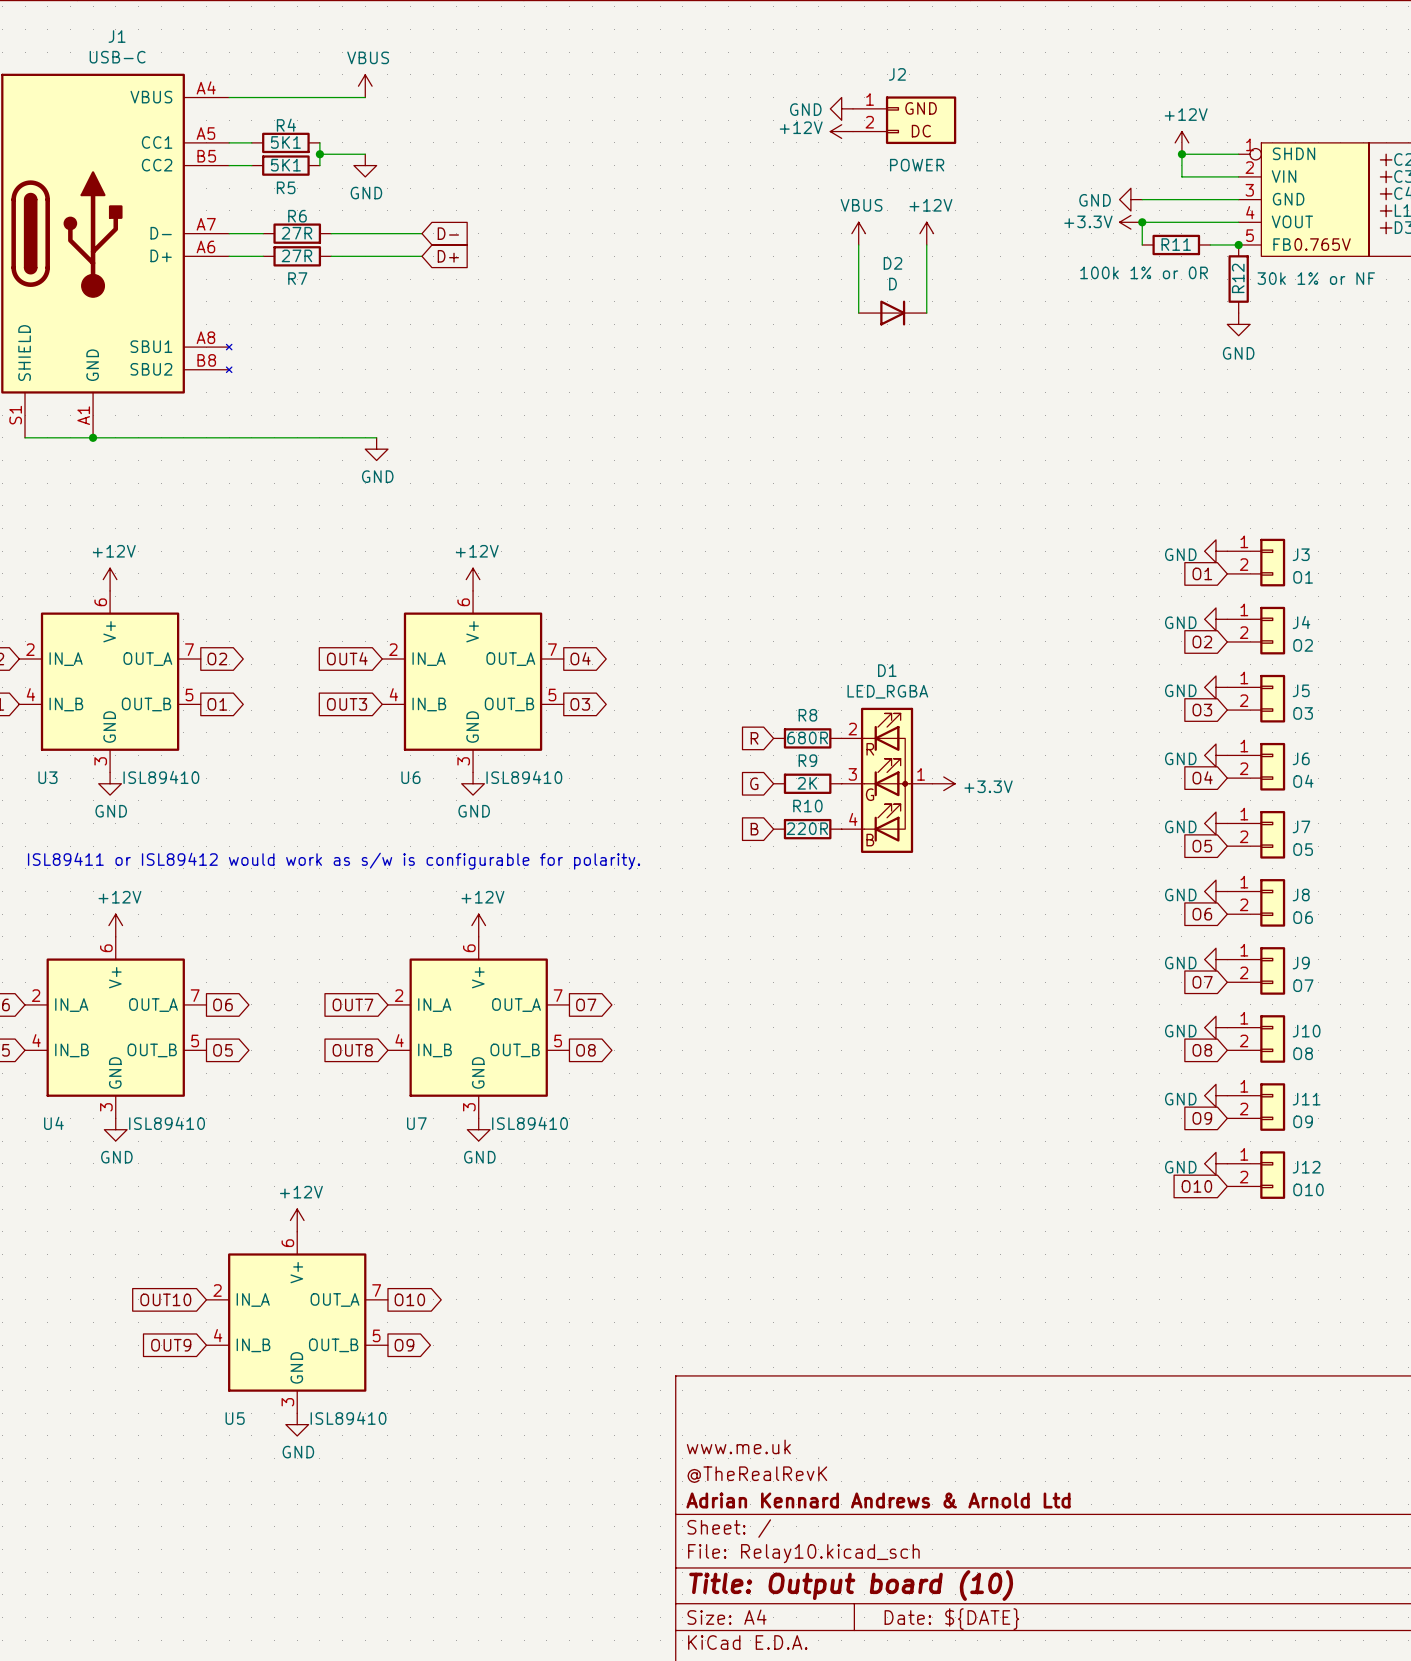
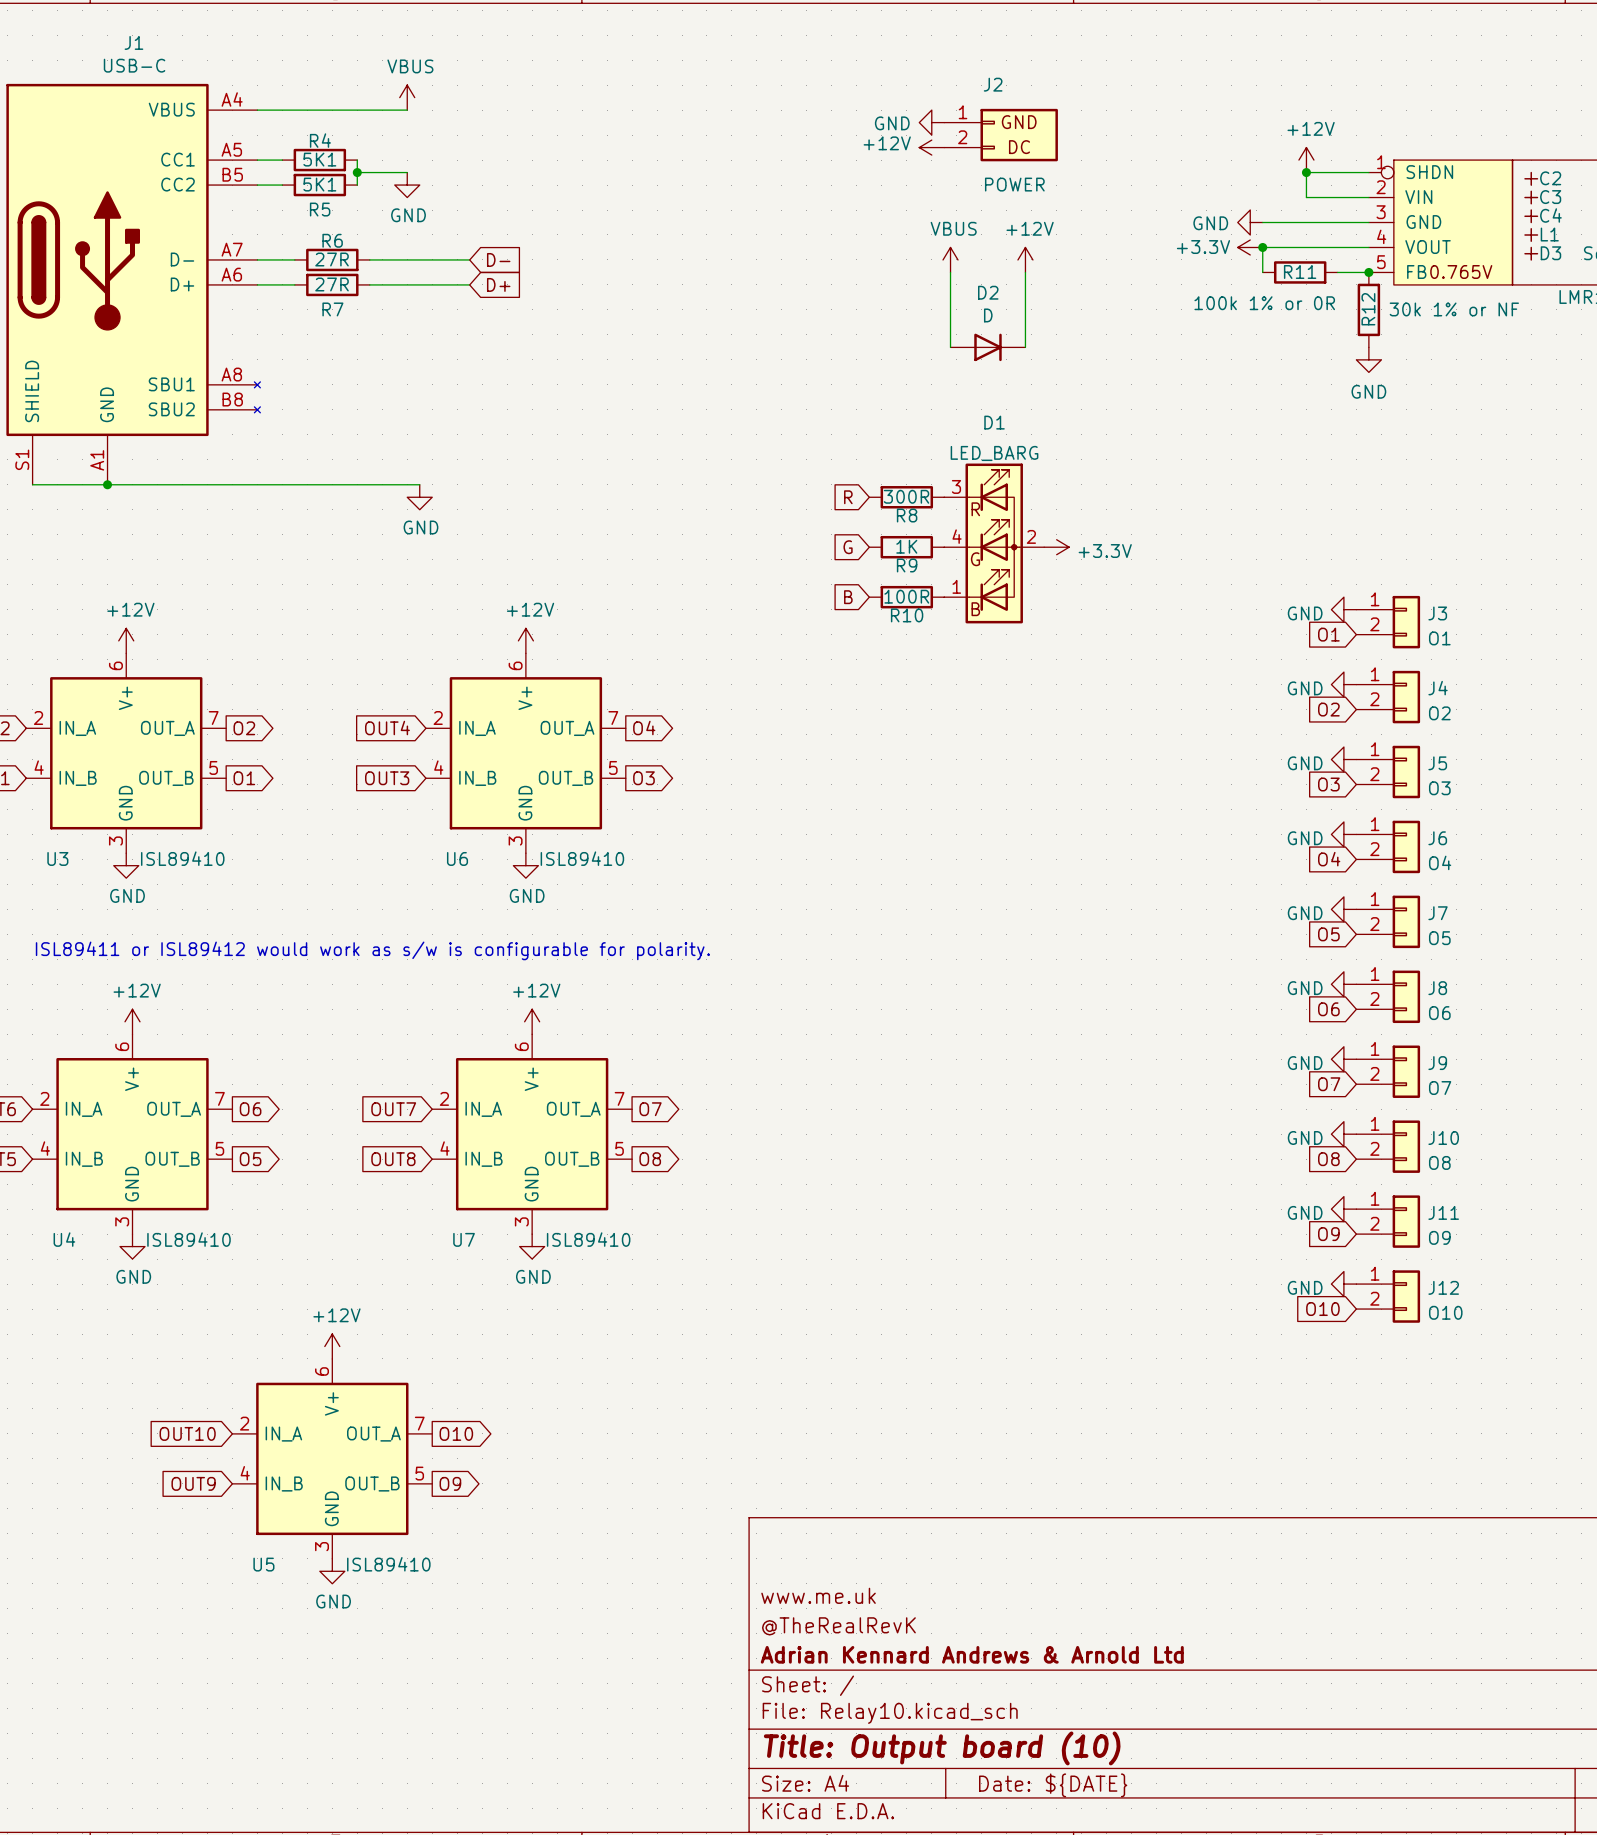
global label: none -> R (848, 497)
global label: none -> G (848, 547)
power symbol: none -> +3.3V (1056, 547)
global label: none -> B (848, 597)
D1 value: LED_RGBA (887, 691) -> LED_BARG (994, 453)
R8 name position: R8 (807, 715) -> R8 (907, 515)
D1 pin number: 2 (852, 729) -> 3 (956, 486)
R8 value: 680R (807, 737) -> 300R (906, 496)
global label: R (754, 738) -> none
R8 position: (807, 738) -> (906, 497)
R9 name position: R9 (807, 760) -> R9 (907, 565)
D1 pin number: 3 (852, 774) -> 4 (957, 536)
D1 pin number: 1 (921, 774) -> 2 (1031, 536)
D1 position: (887, 780) -> (994, 543)
global label: G (754, 783) -> none
R9 position: (807, 783) -> (906, 547)
R9 value: 2K (807, 783) -> 1K (906, 546)
power symbol: +3.3V (943, 783) -> none
R10 name position: R10 (807, 806) -> R10 (907, 615)
D1 pin number: 4 (853, 819) -> 1 (956, 586)
R10 value: 220R (807, 828) -> 100R (906, 596)
global label: B (754, 829) -> none
R10 position: (807, 829) -> (906, 597)

